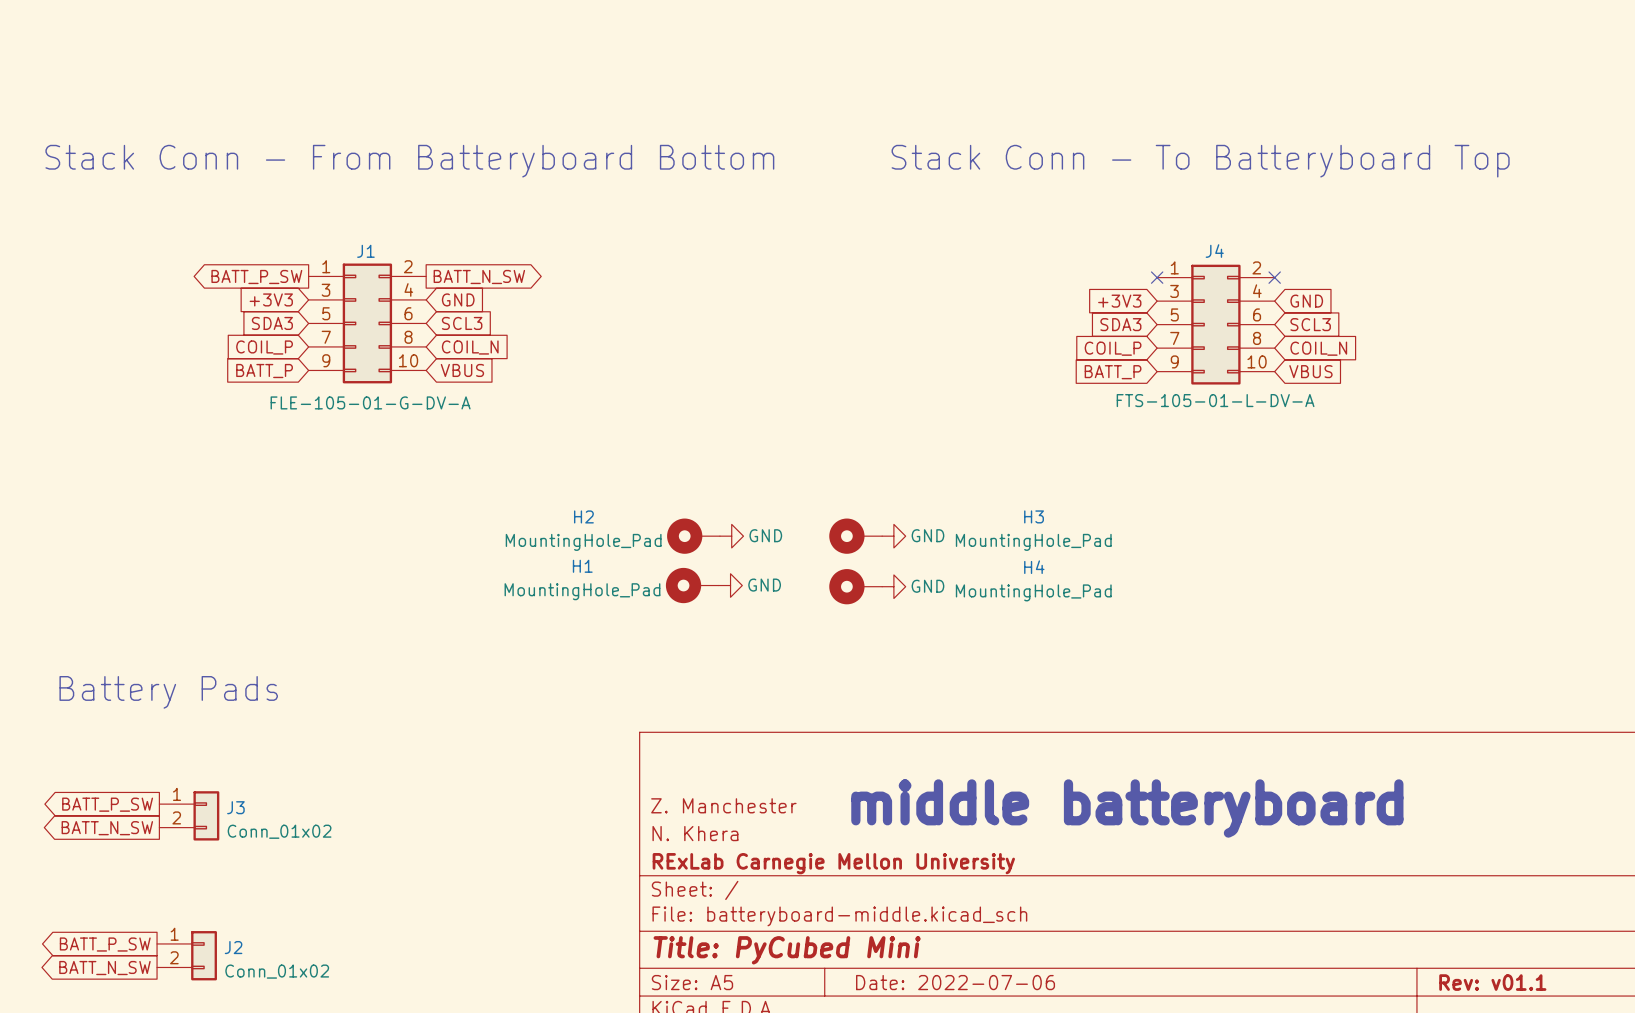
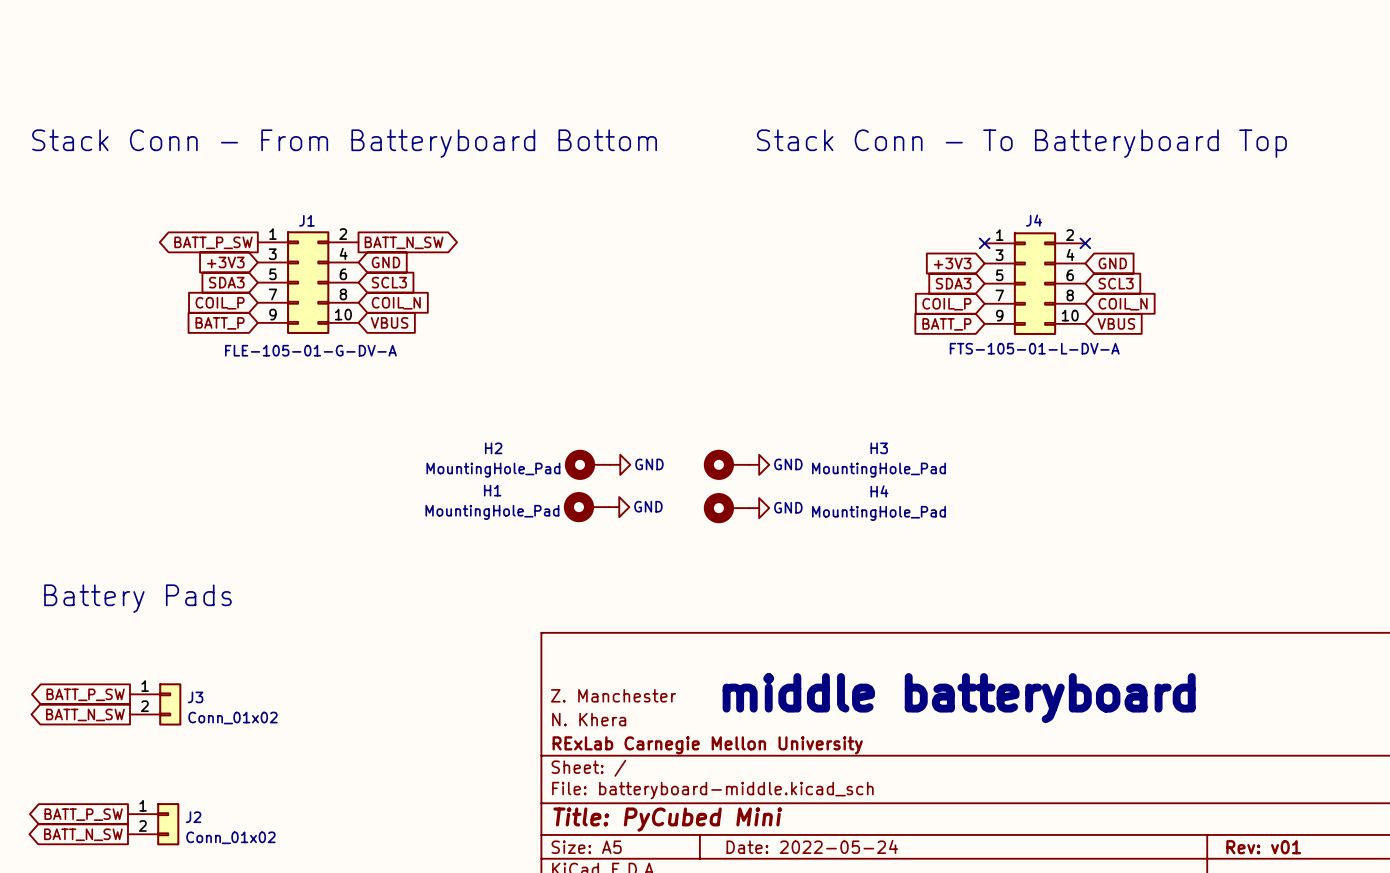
title block: Date: 2022-07-06 (955, 982) -> Date: 2022-05-24 (812, 846)
title block: Rev: v01.1 (1492, 982) -> Rev: v01 (1263, 847)

